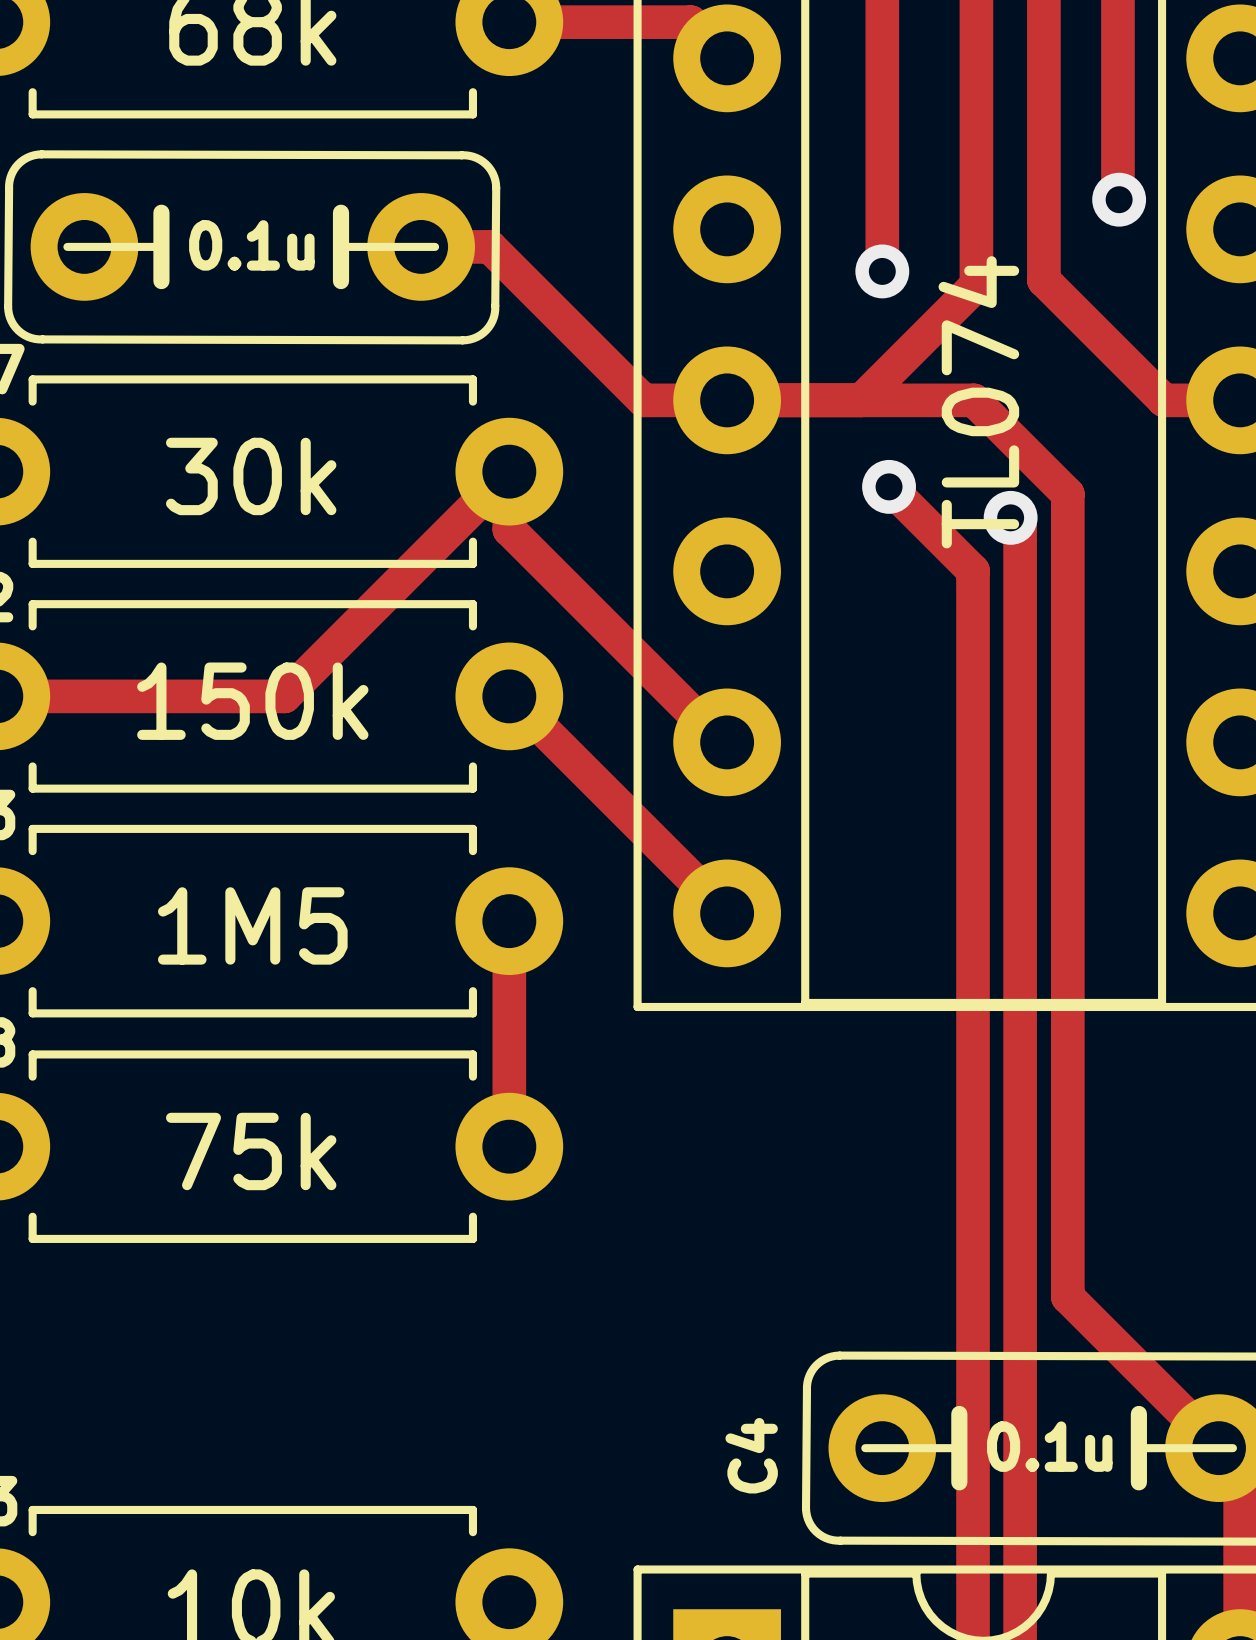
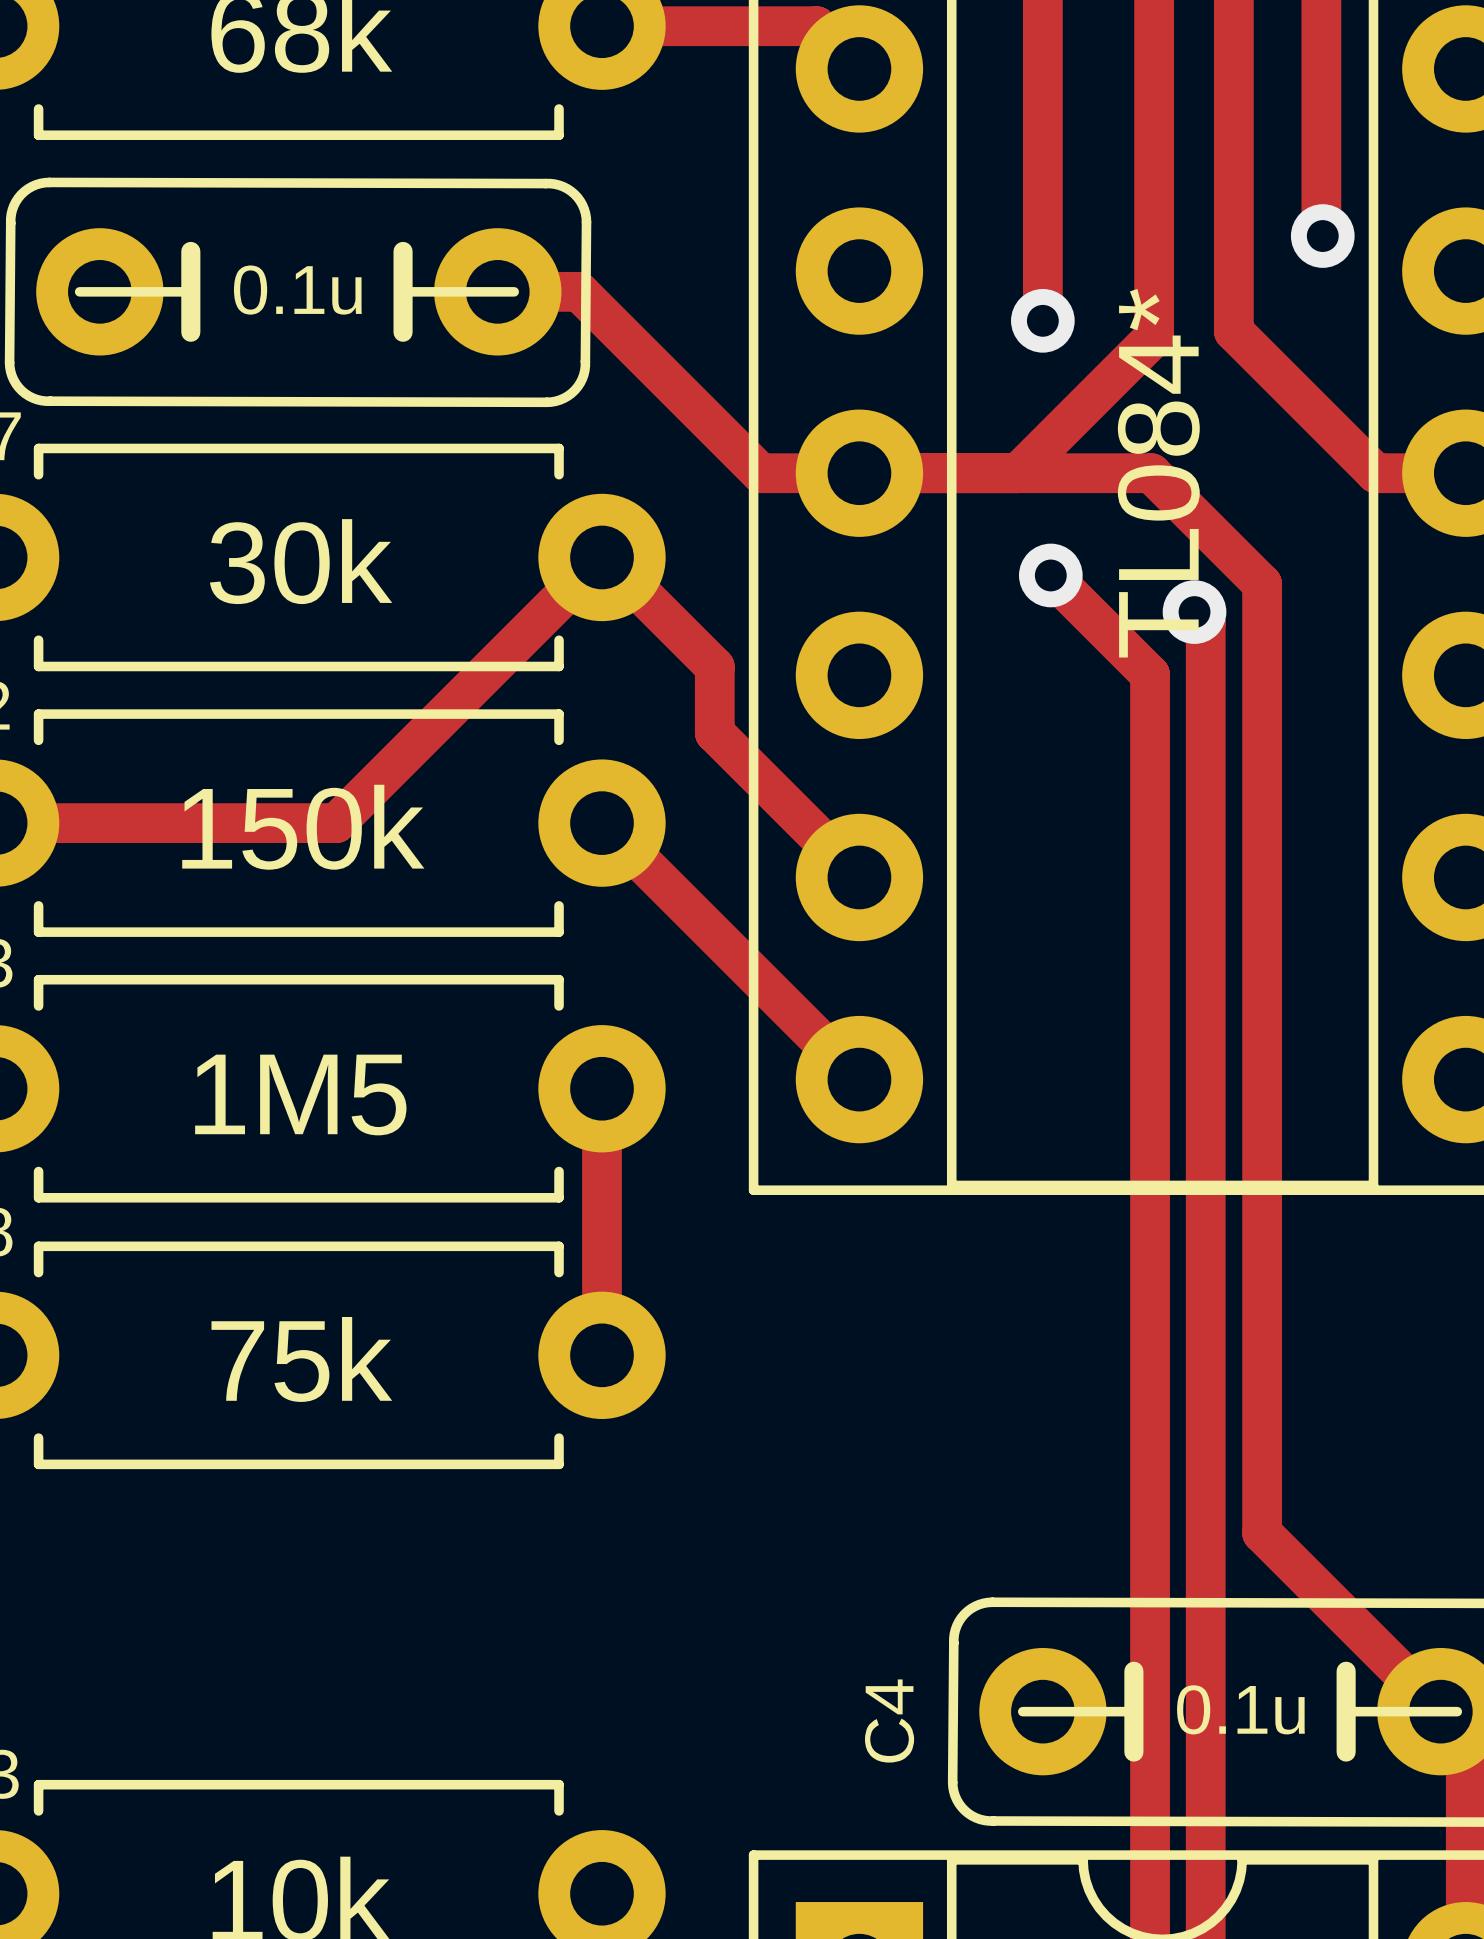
part value: TL074 (978, 402) -> TL084* (1158, 473)
track: (509, 471) (509, 529) (722, 742) (727, 742) -> (602, 557) (605, 557) (714, 666) (714, 732) (859, 877)

